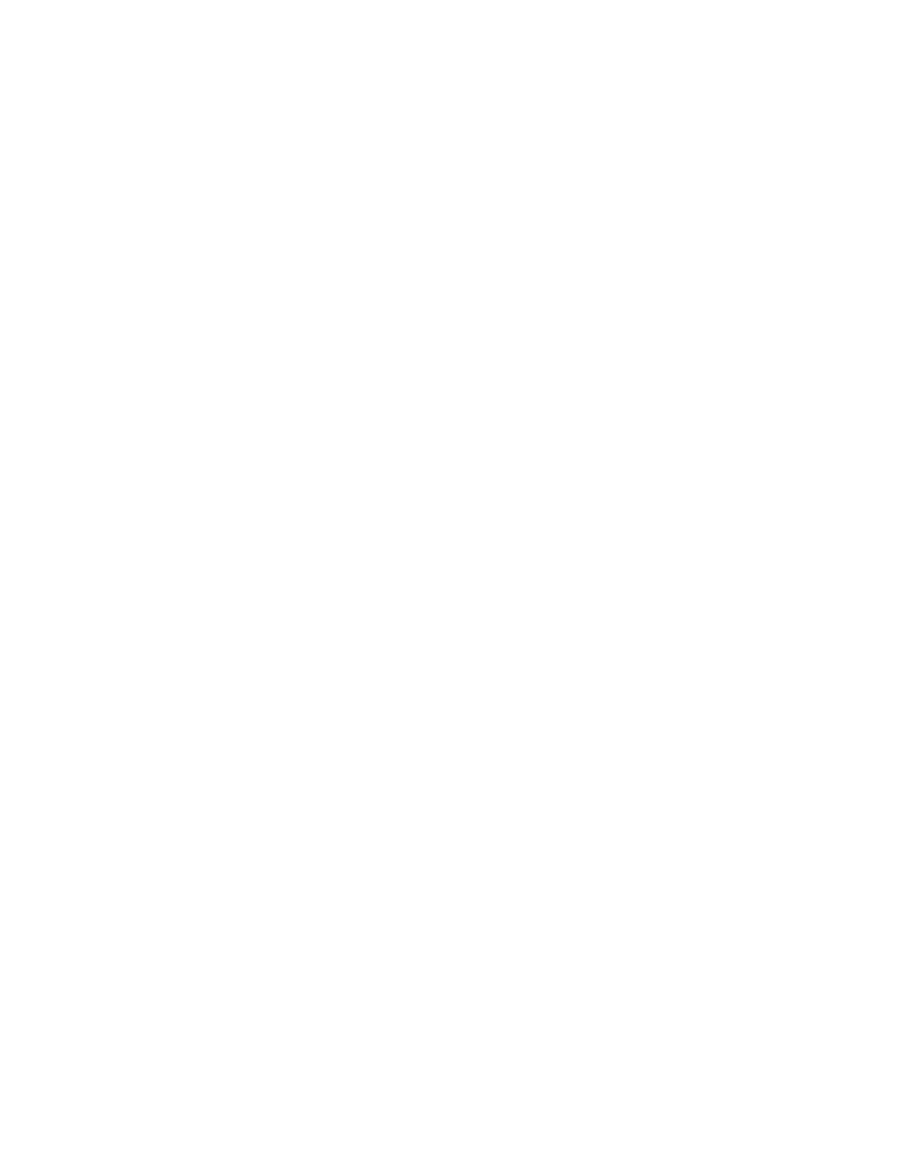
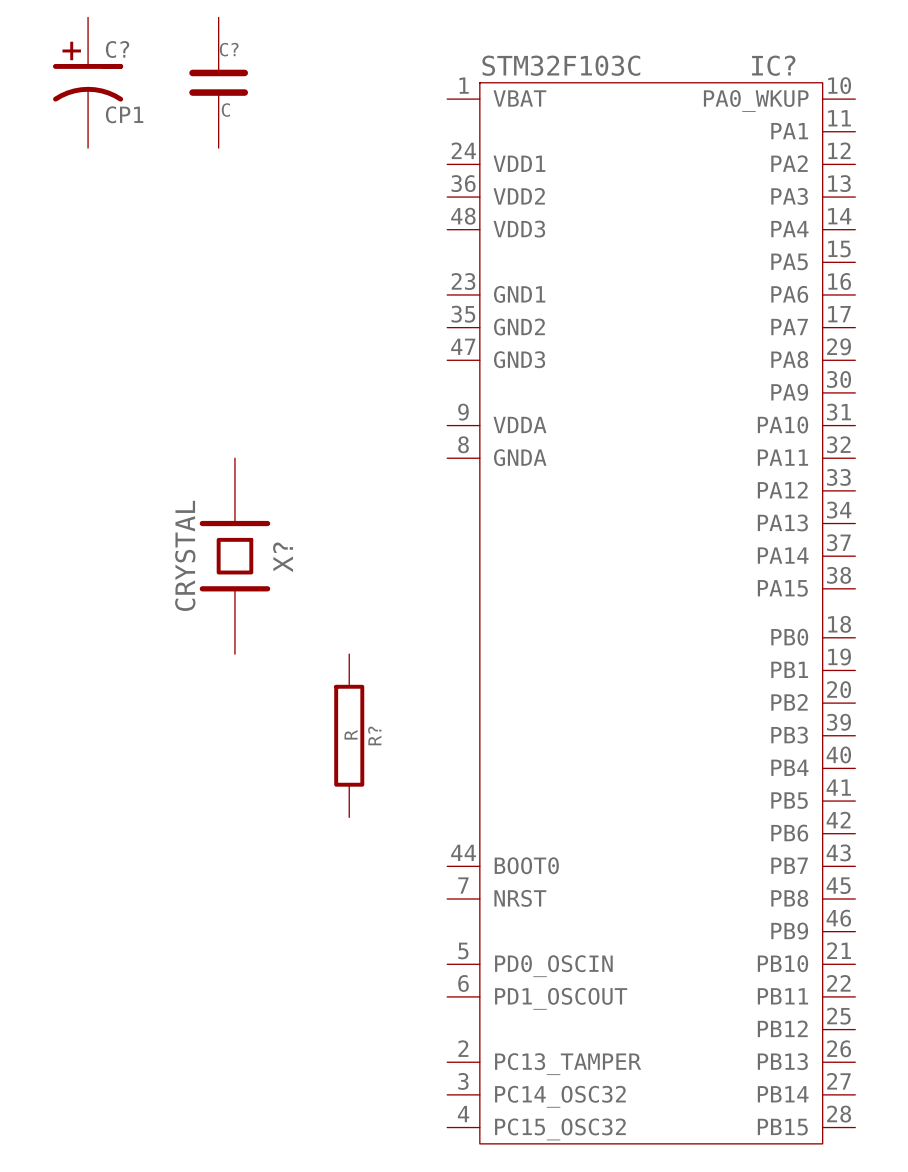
C?: none -> CP1 (88, 82)
C?: none -> C (218, 82)
X?: none -> CRYSTAL (234, 556)
IC?: none -> STM32F103C (651, 613)
R?: none -> R (349, 735)

